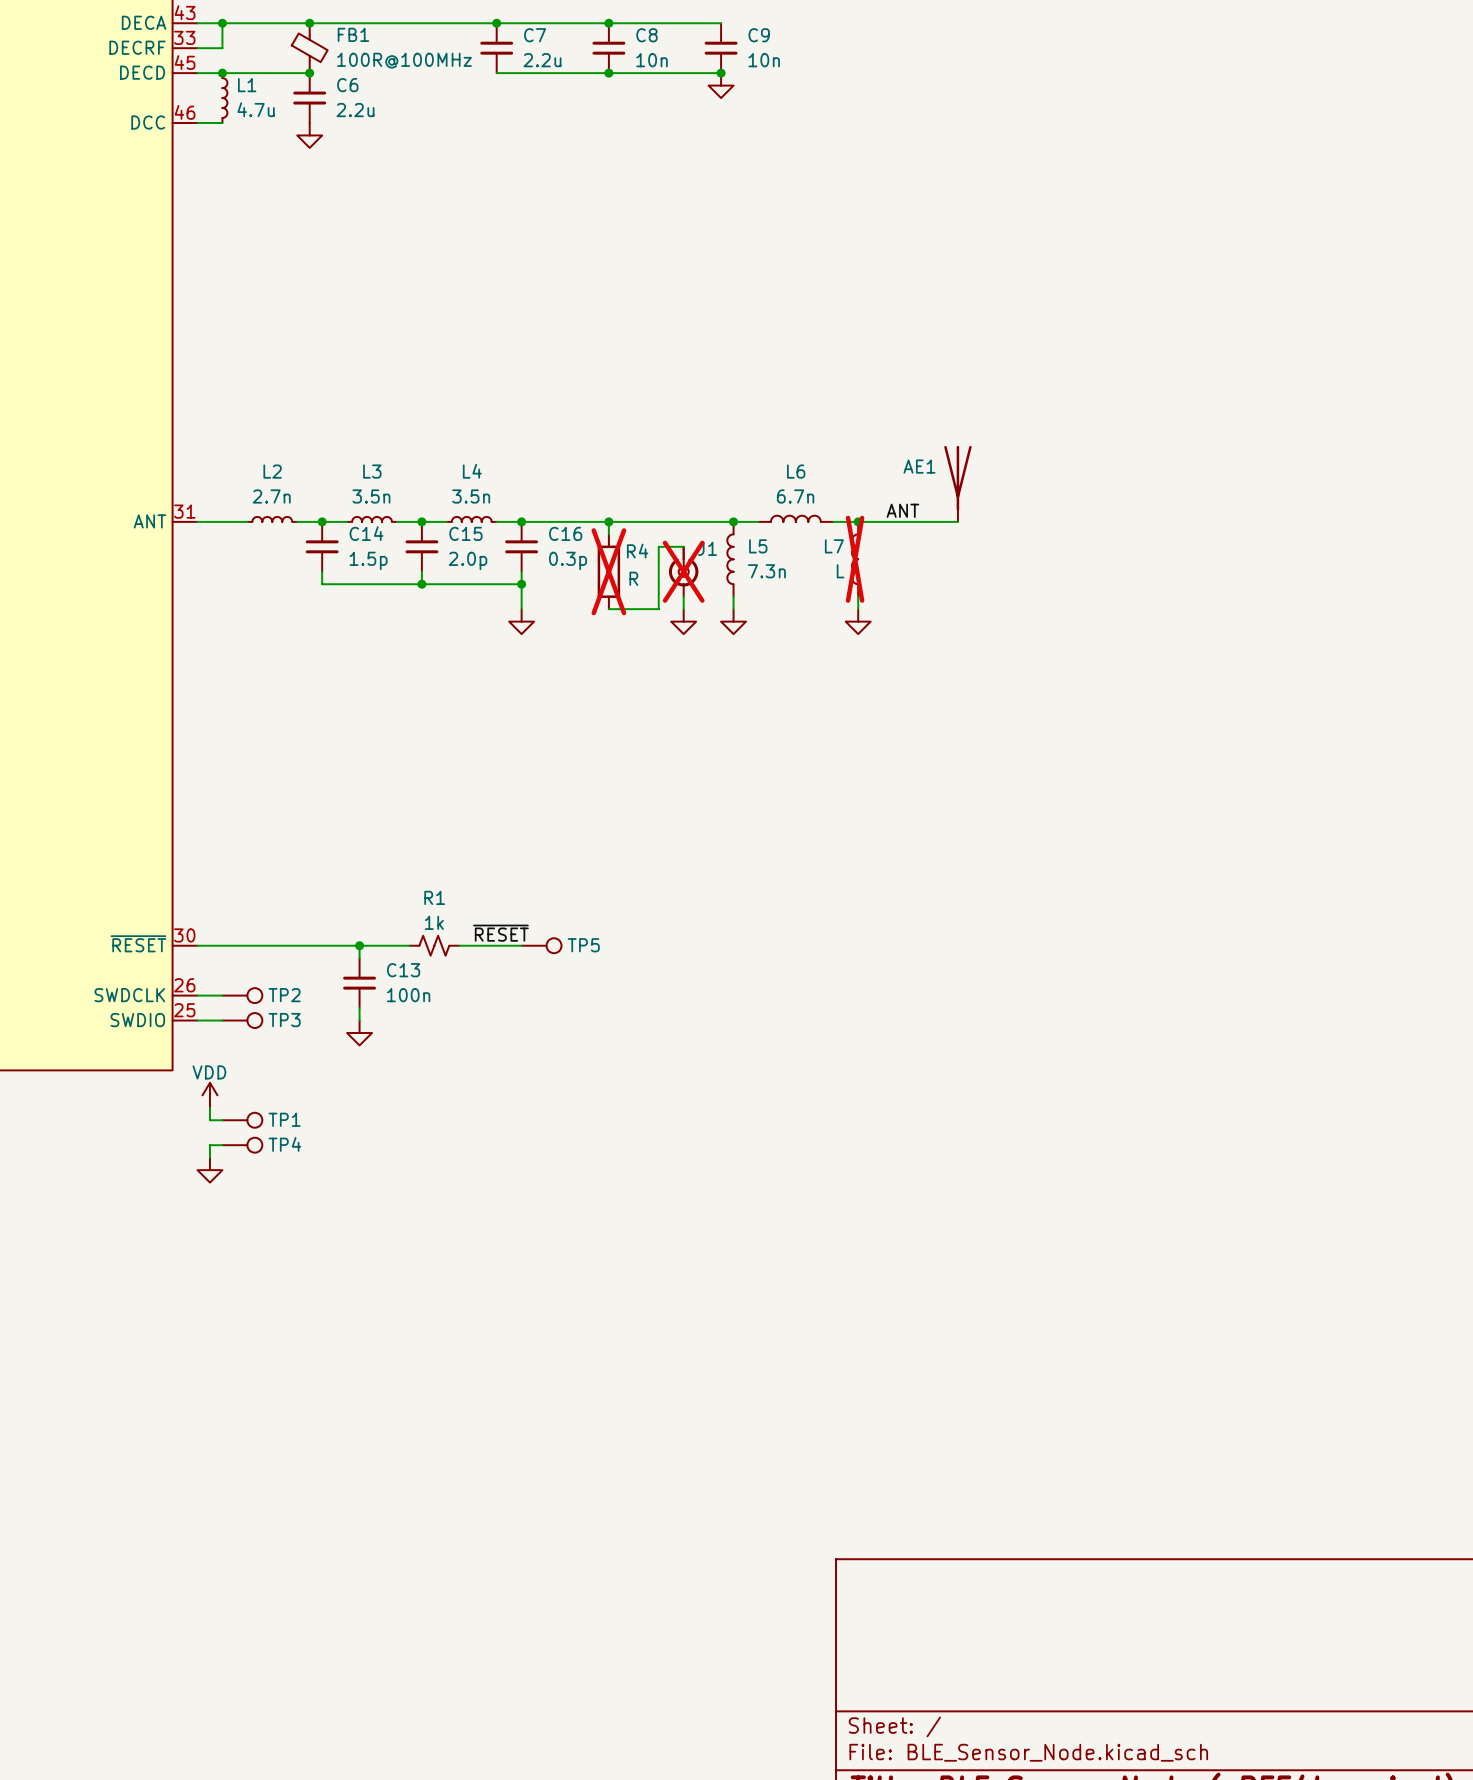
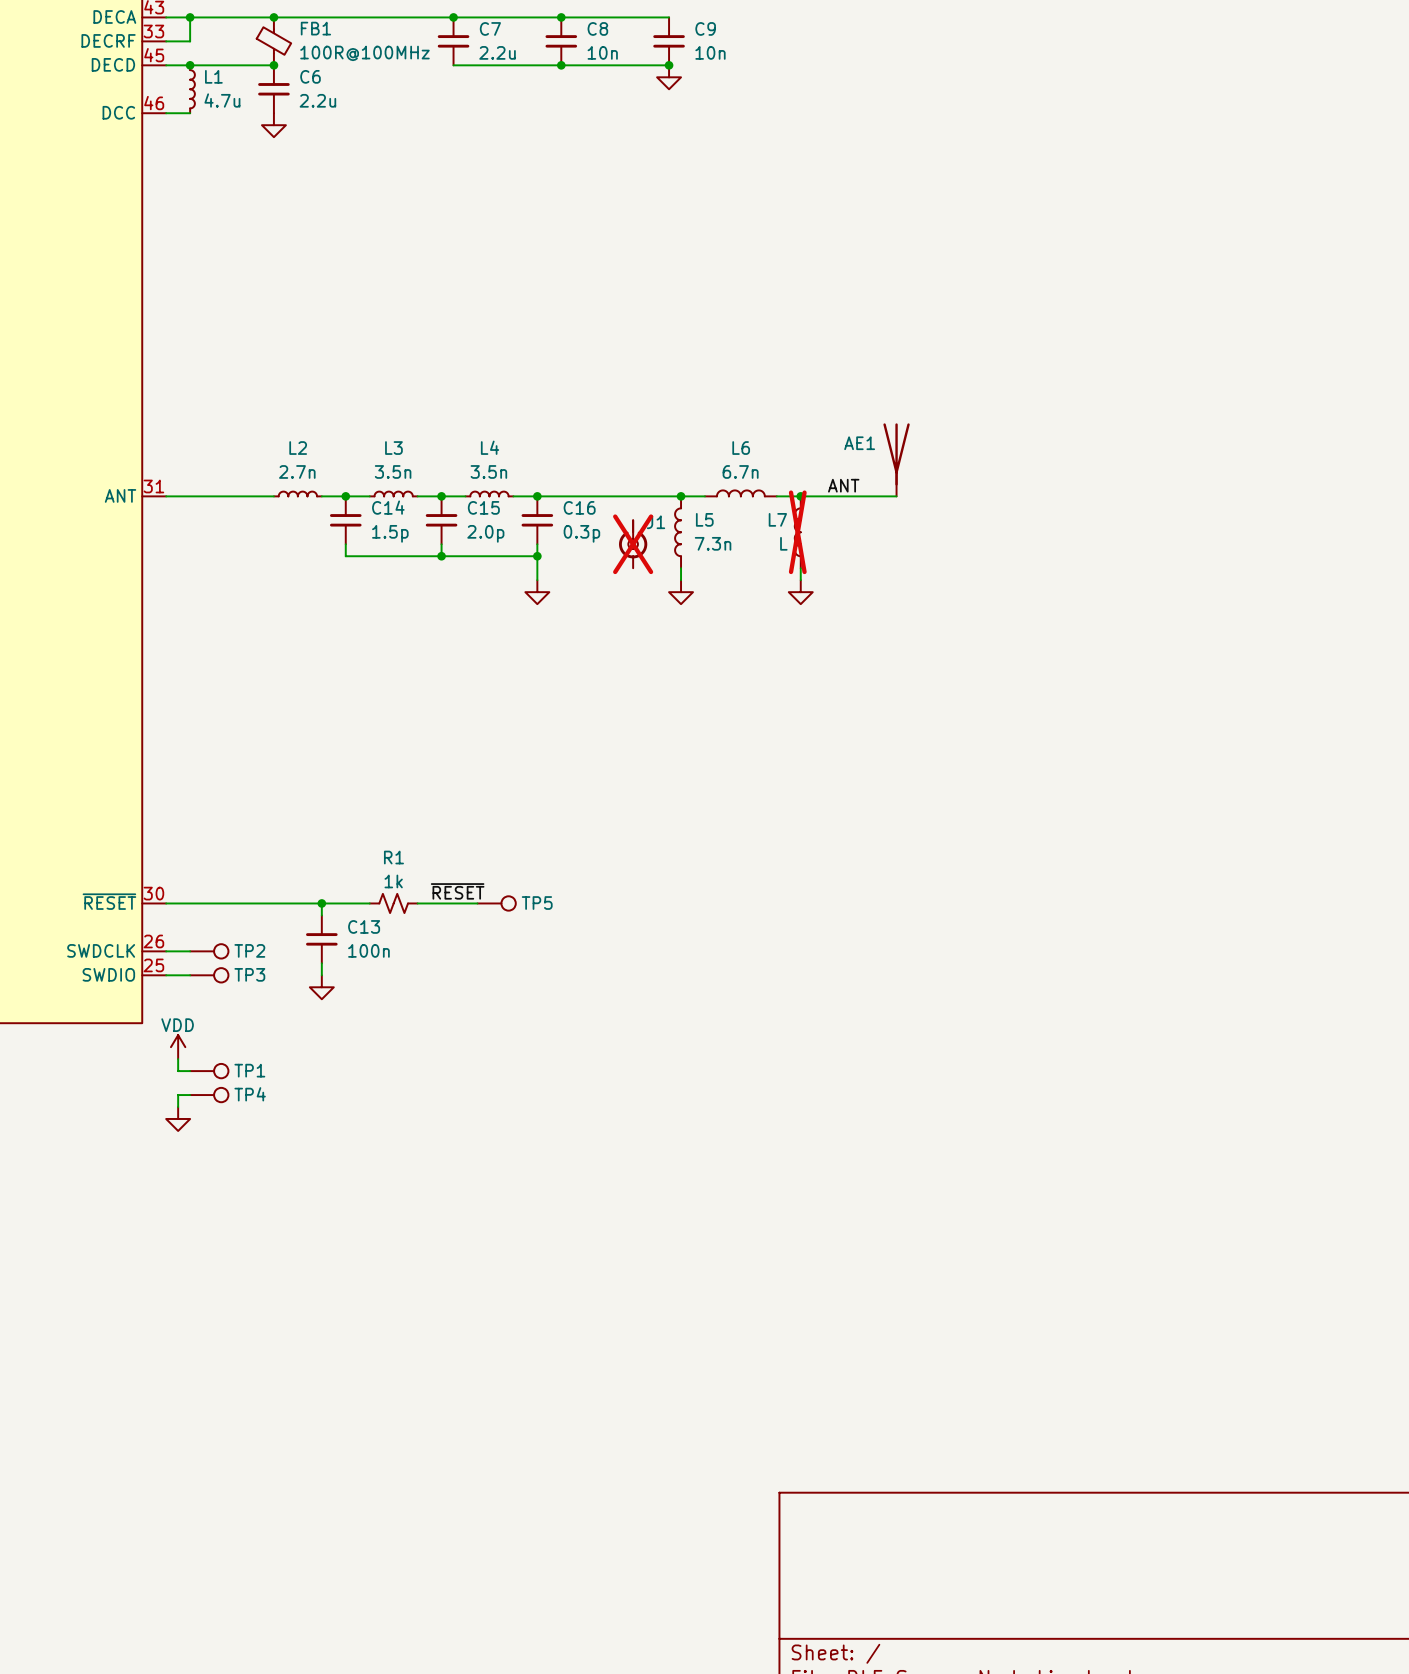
L2 position: (272, 519) -> (297, 493)
L3 position: (372, 519) -> (393, 493)
L4 position: (471, 519) -> (489, 493)
wire: none -> (214, 496) (261, 496)
wire: (309, 521) (347, 521) -> (321, 496) (357, 496)
junction: (322, 521) -> none
junction: none -> (345, 496)
wire: (409, 521) (446, 521) -> (417, 496) (453, 496)
junction: (421, 521) -> none
junction: none -> (441, 496)
wire: (509, 521) (559, 521) -> none
junction: (521, 521) -> none
wire: (608, 521) (608, 534) -> none
junction position: (608, 521) -> (537, 496)
C14 position: (322, 546) -> (345, 520)
C15 position: (421, 546) -> (441, 520)
C16 position: (521, 546) -> (537, 520)
wire: (683, 546) (658, 546) (658, 609) (608, 609) -> none
wire: (322, 571) (322, 584) (384, 584) -> (345, 544) (345, 556)
wire: (421, 571) (421, 584) -> (441, 544) (441, 556)
wire: (521, 571) (521, 609) -> (537, 544) (537, 580)
R4: R (608, 571) -> none
junction: (421, 584) -> none
junction: none -> (441, 556)
wire: none -> (477, 556) (537, 556)
junction: (521, 584) -> none
junction: none -> (537, 556)
wire: (683, 596) (683, 609) -> none
power symbol: (521, 621) -> none
power symbol: none -> (537, 592)
power symbol: (683, 621) -> none

